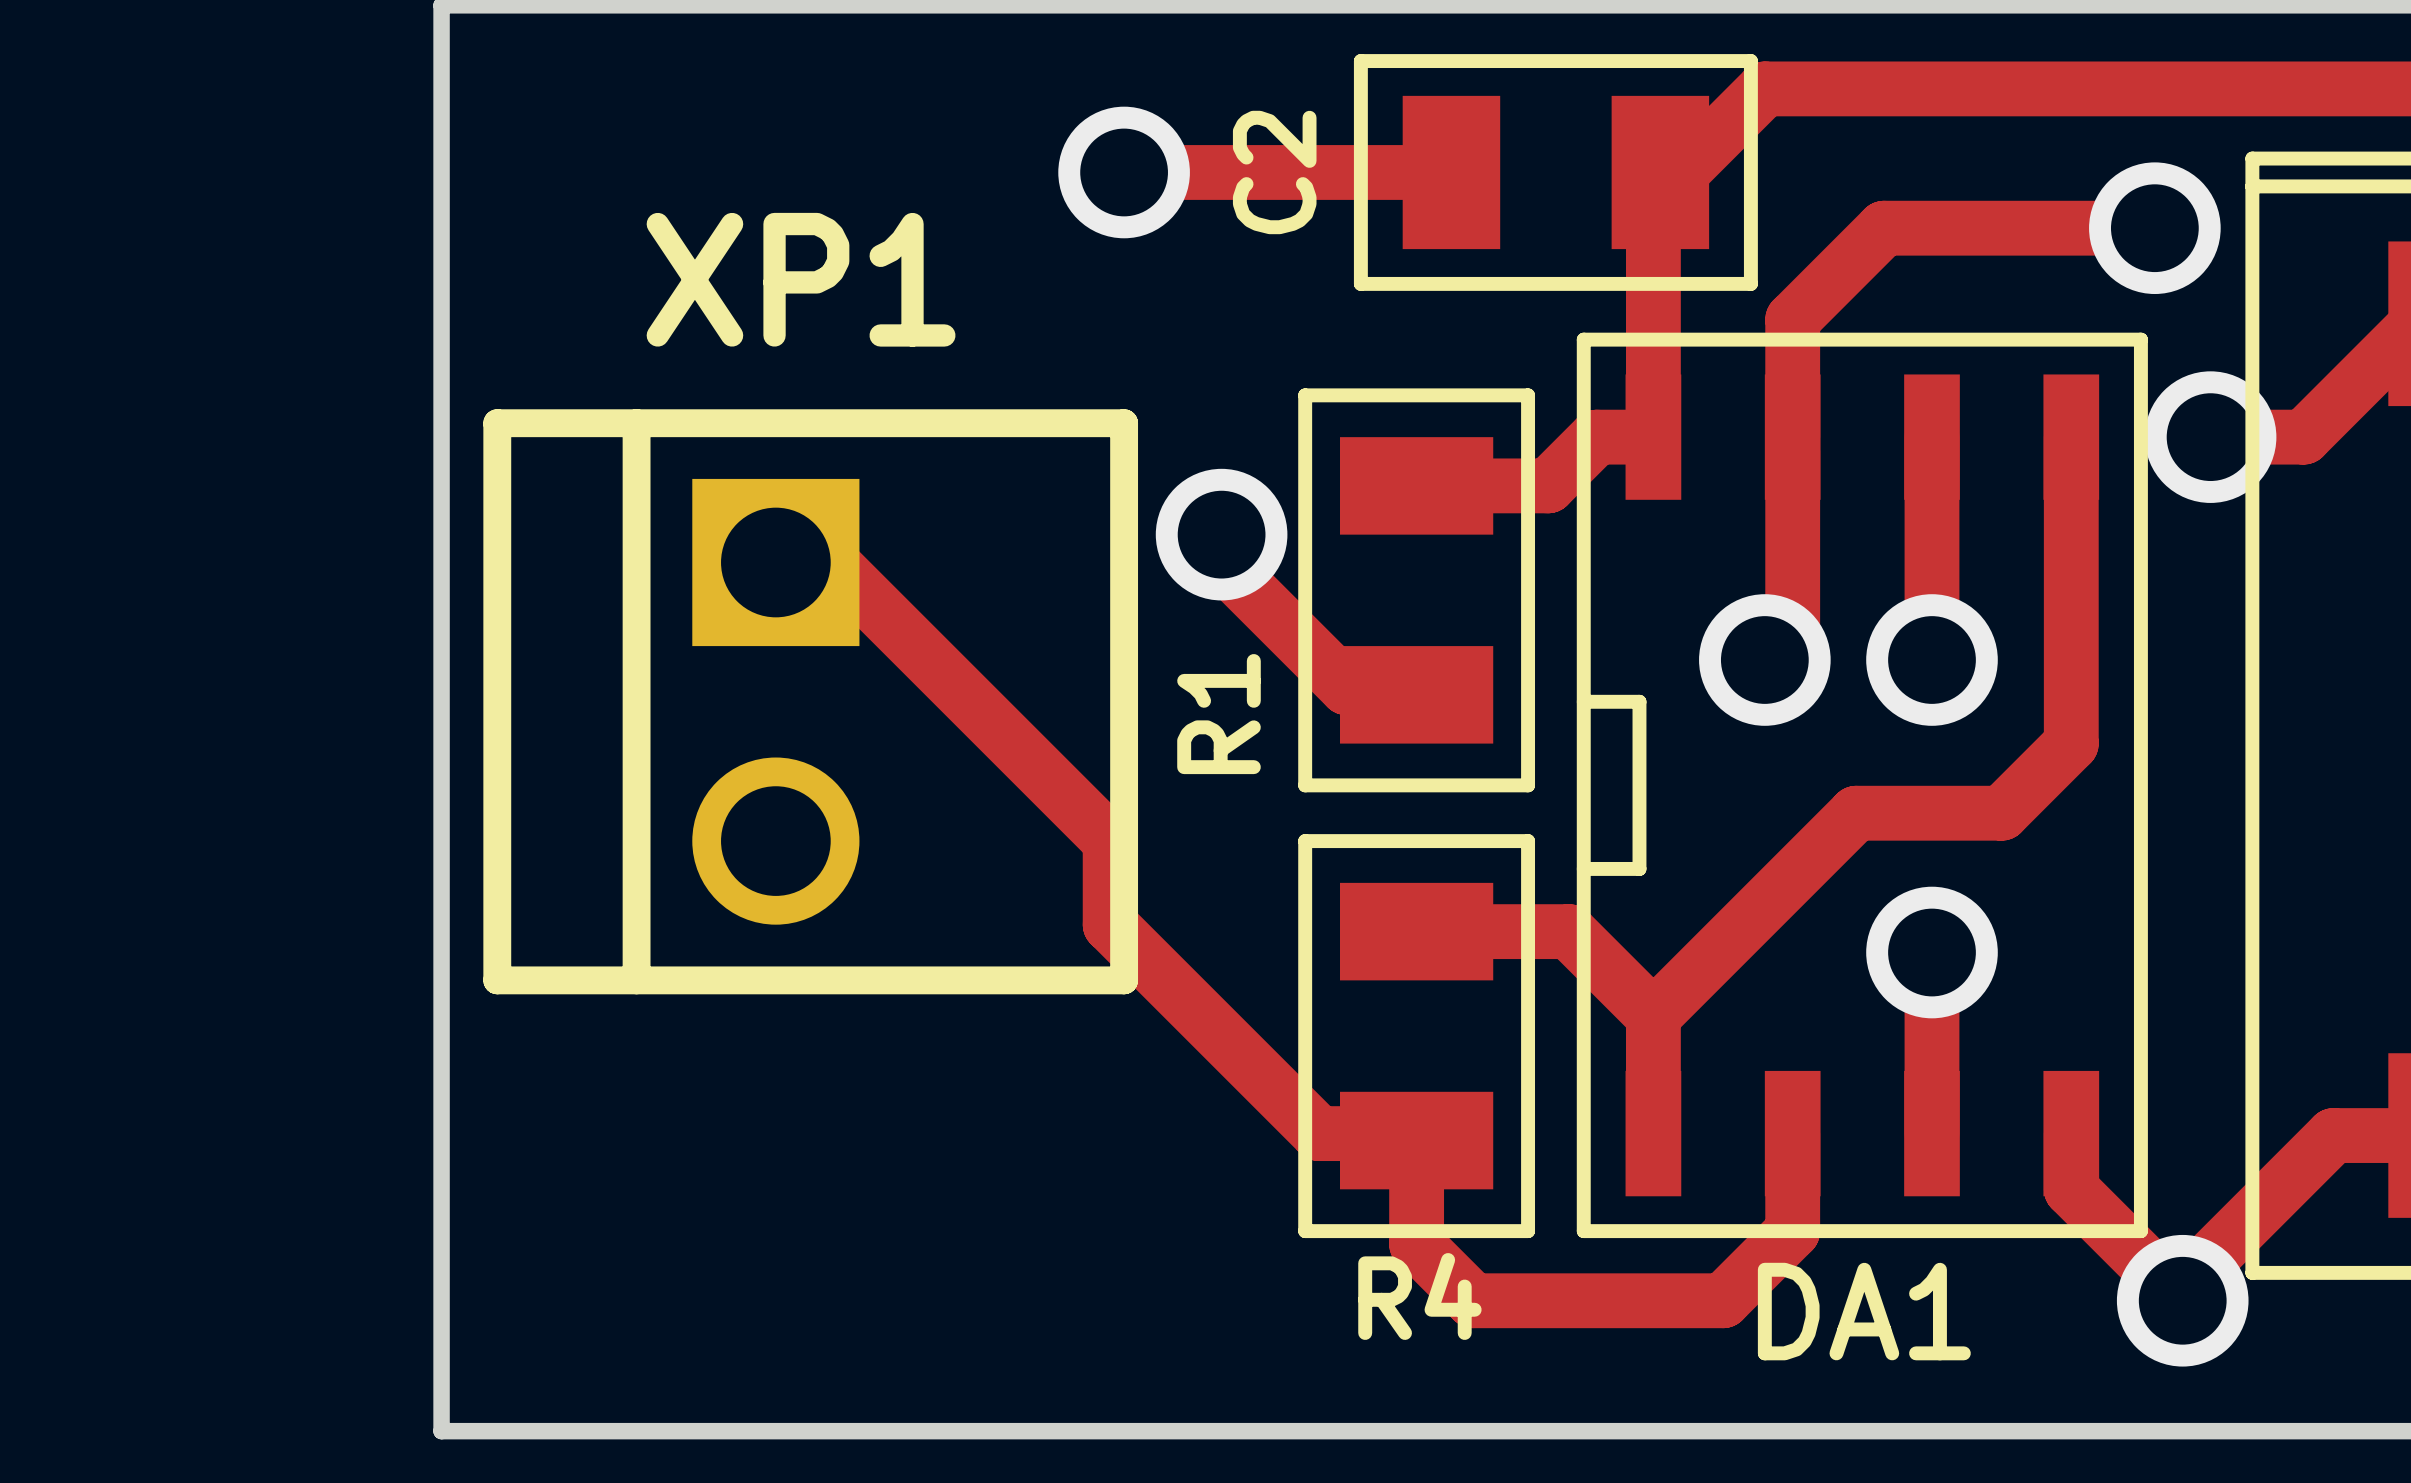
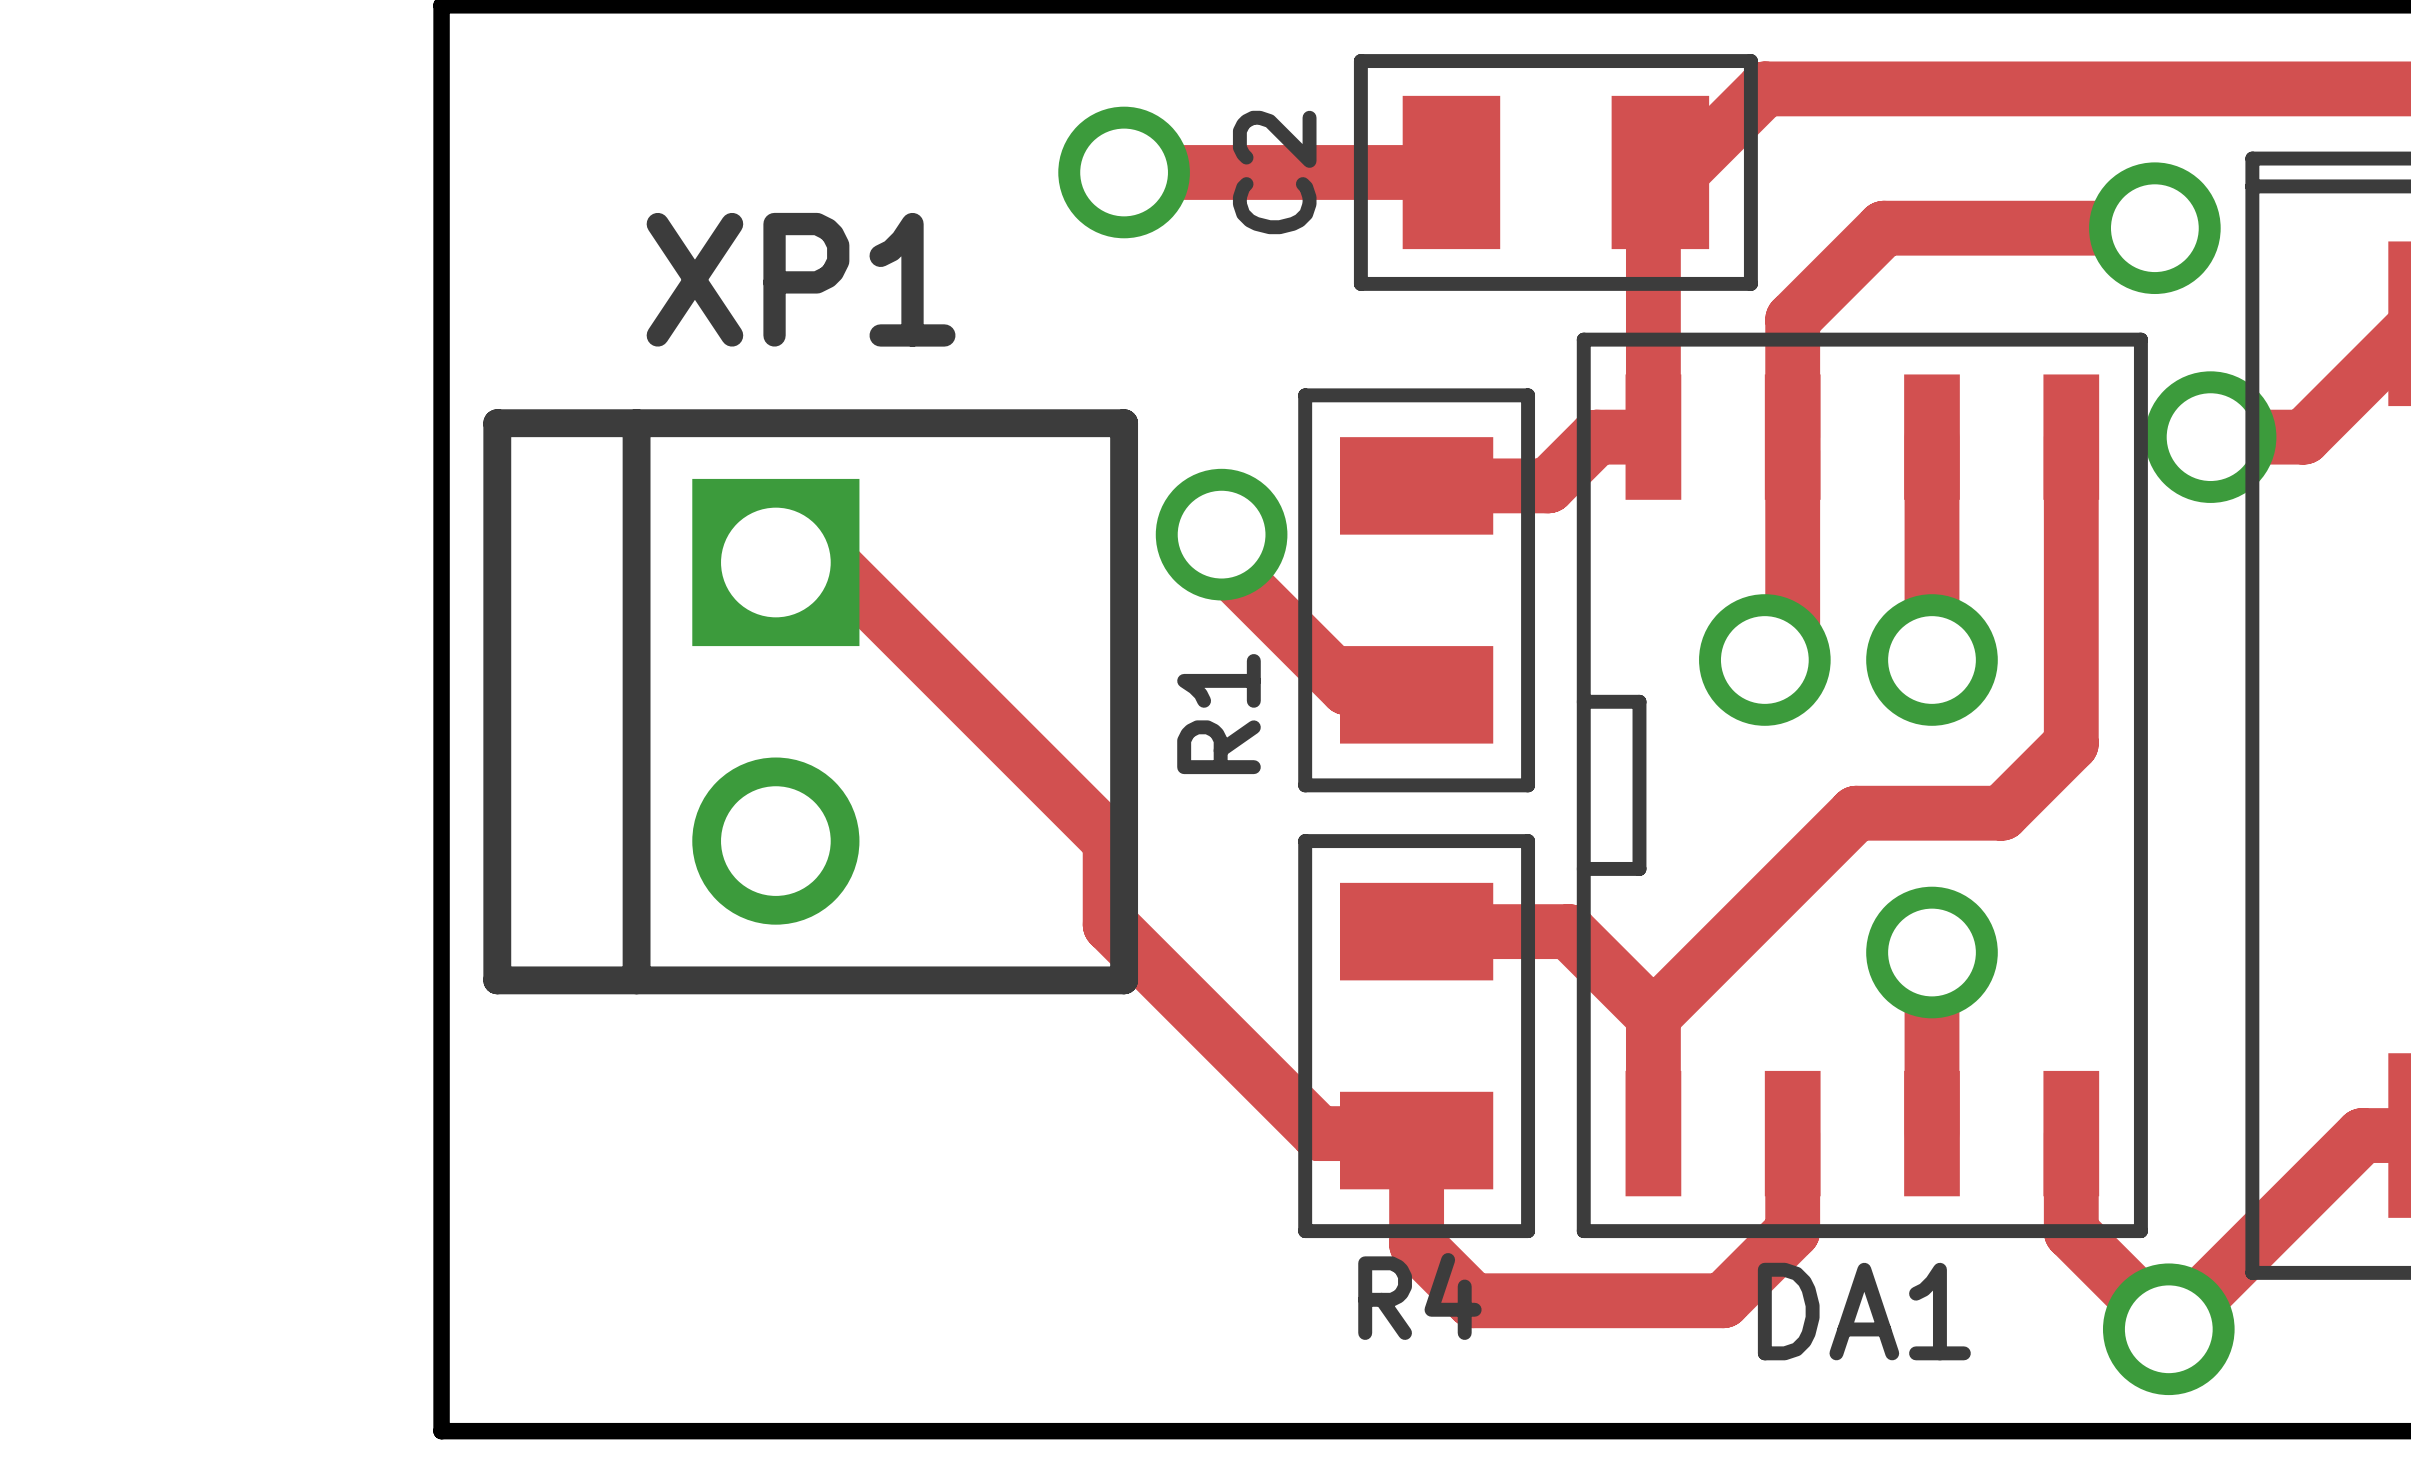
track: (2362, 1135) (2333, 1135) (2182, 1286) (2182, 1300) (2071, 1189) -> (2362, 1135) (2168, 1329) (2071, 1231) (2071, 1189)
via position: (2182, 1300) -> (2168, 1329)

